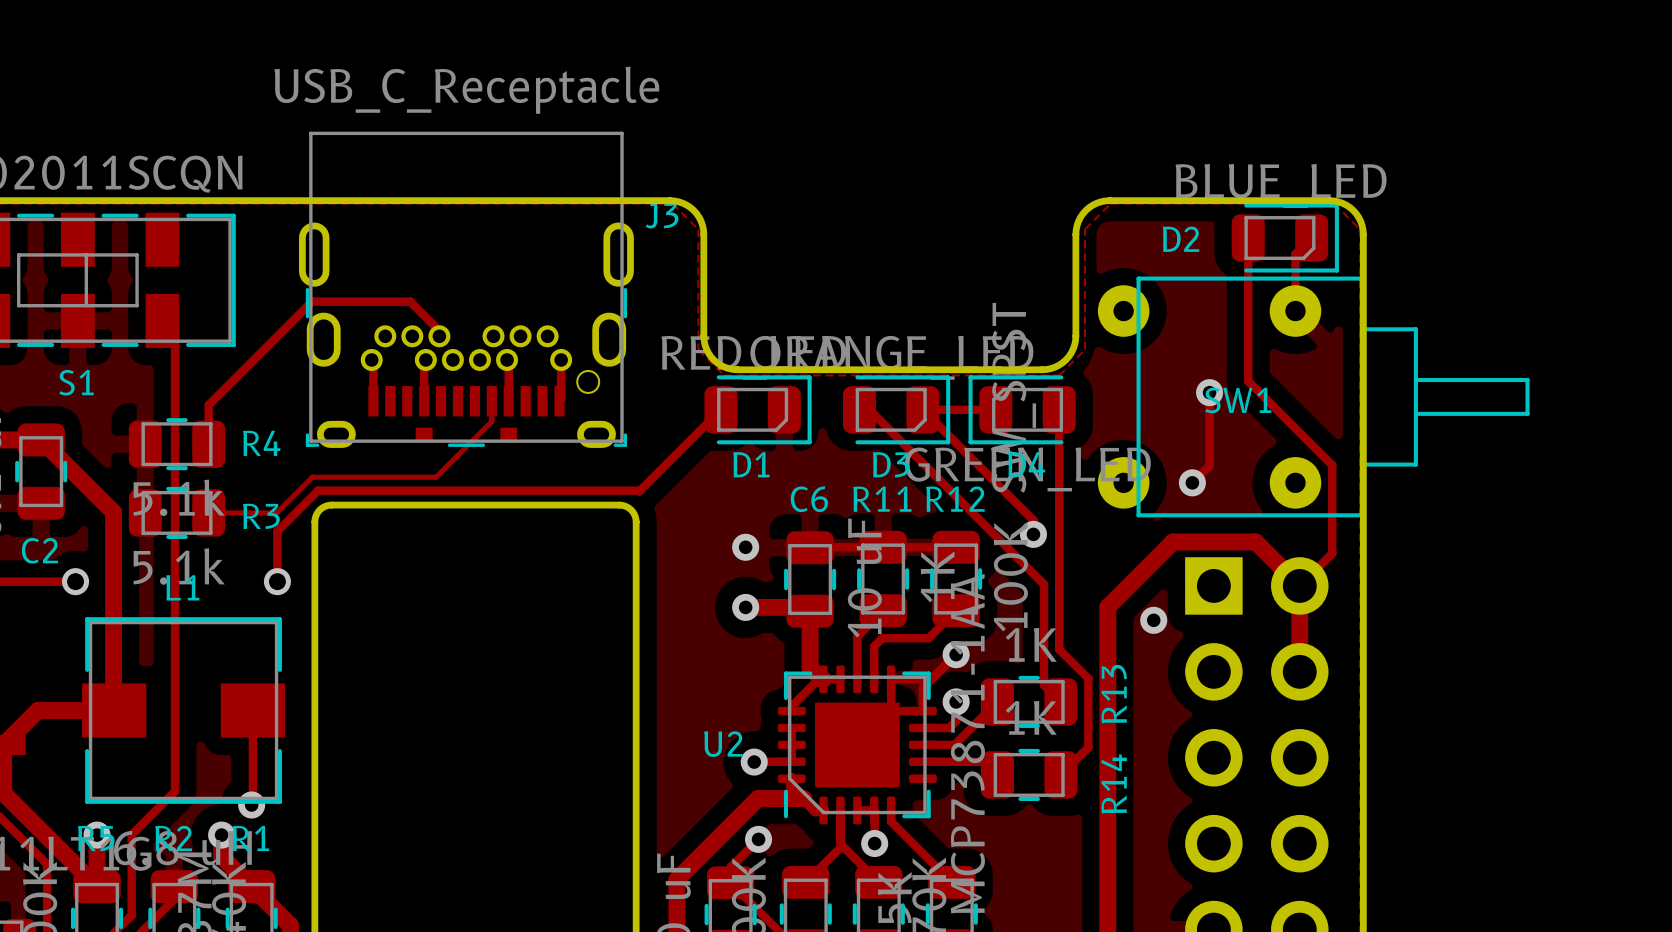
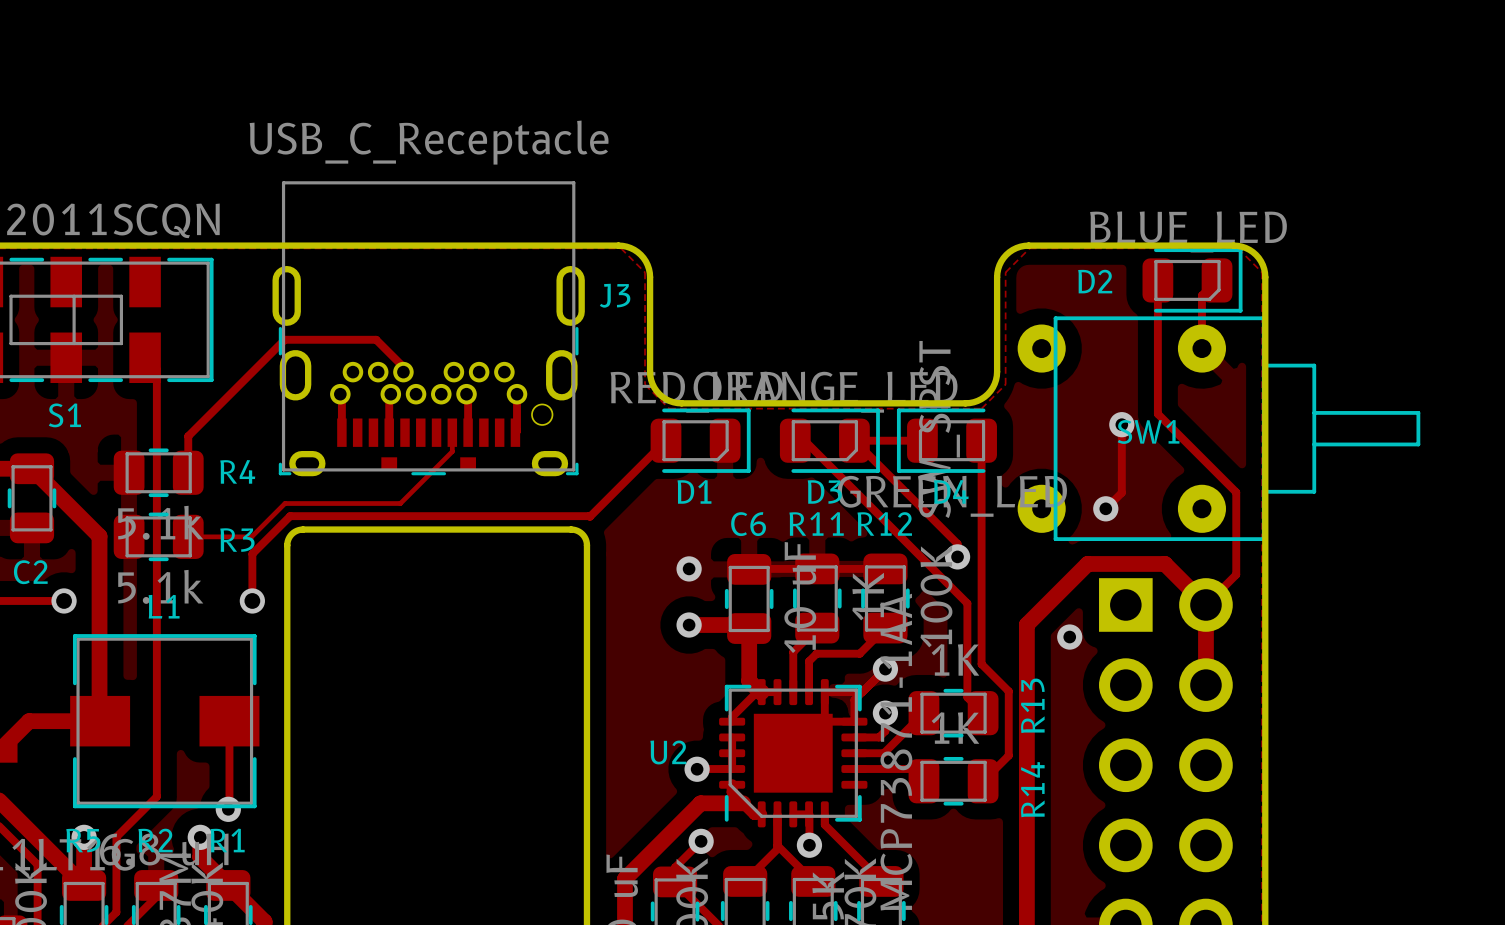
J3 name position: J3 (662, 215) -> J3 (615, 295)

